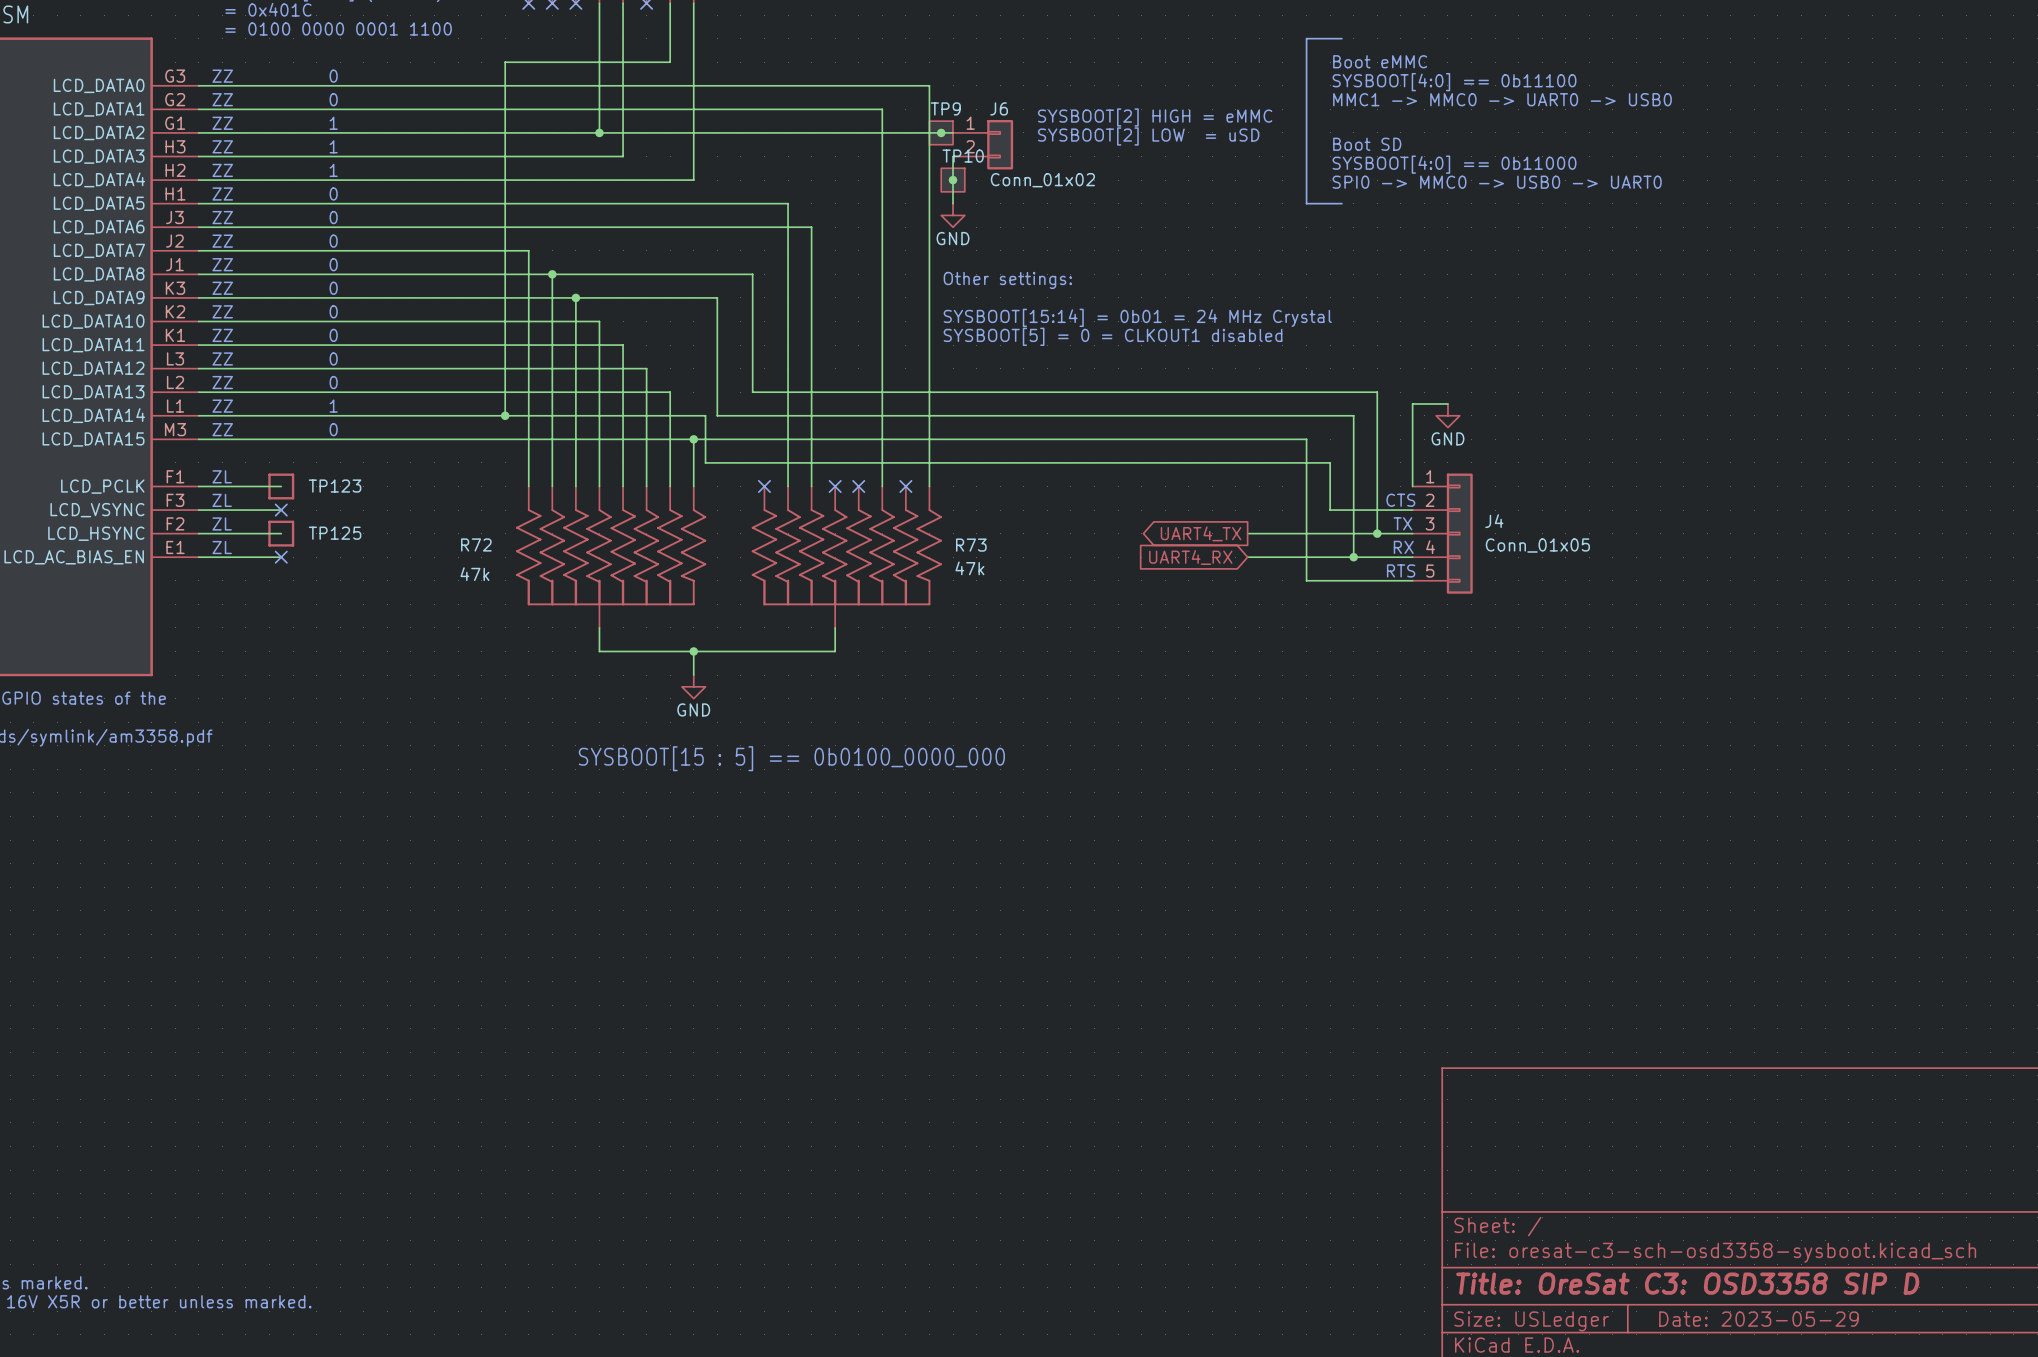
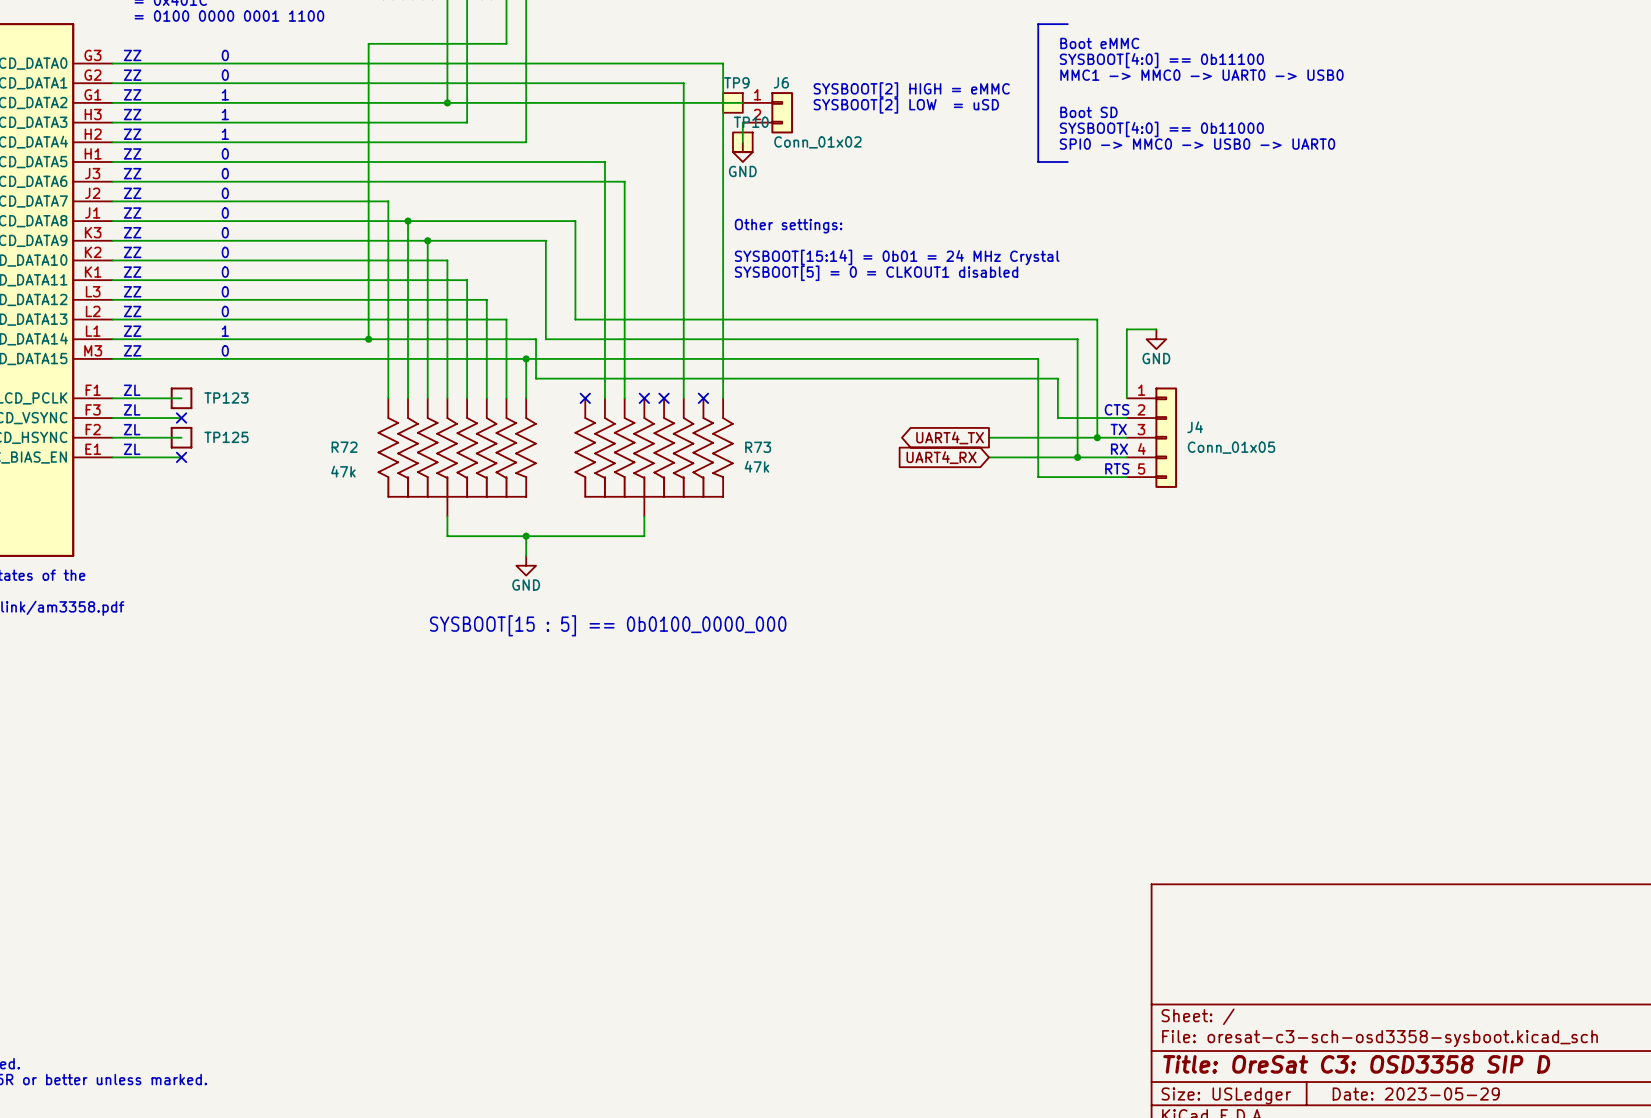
junction: (941, 132) -> none
junction: (953, 180) -> none
power symbol position: GND (953, 215) -> GND (742, 152)

